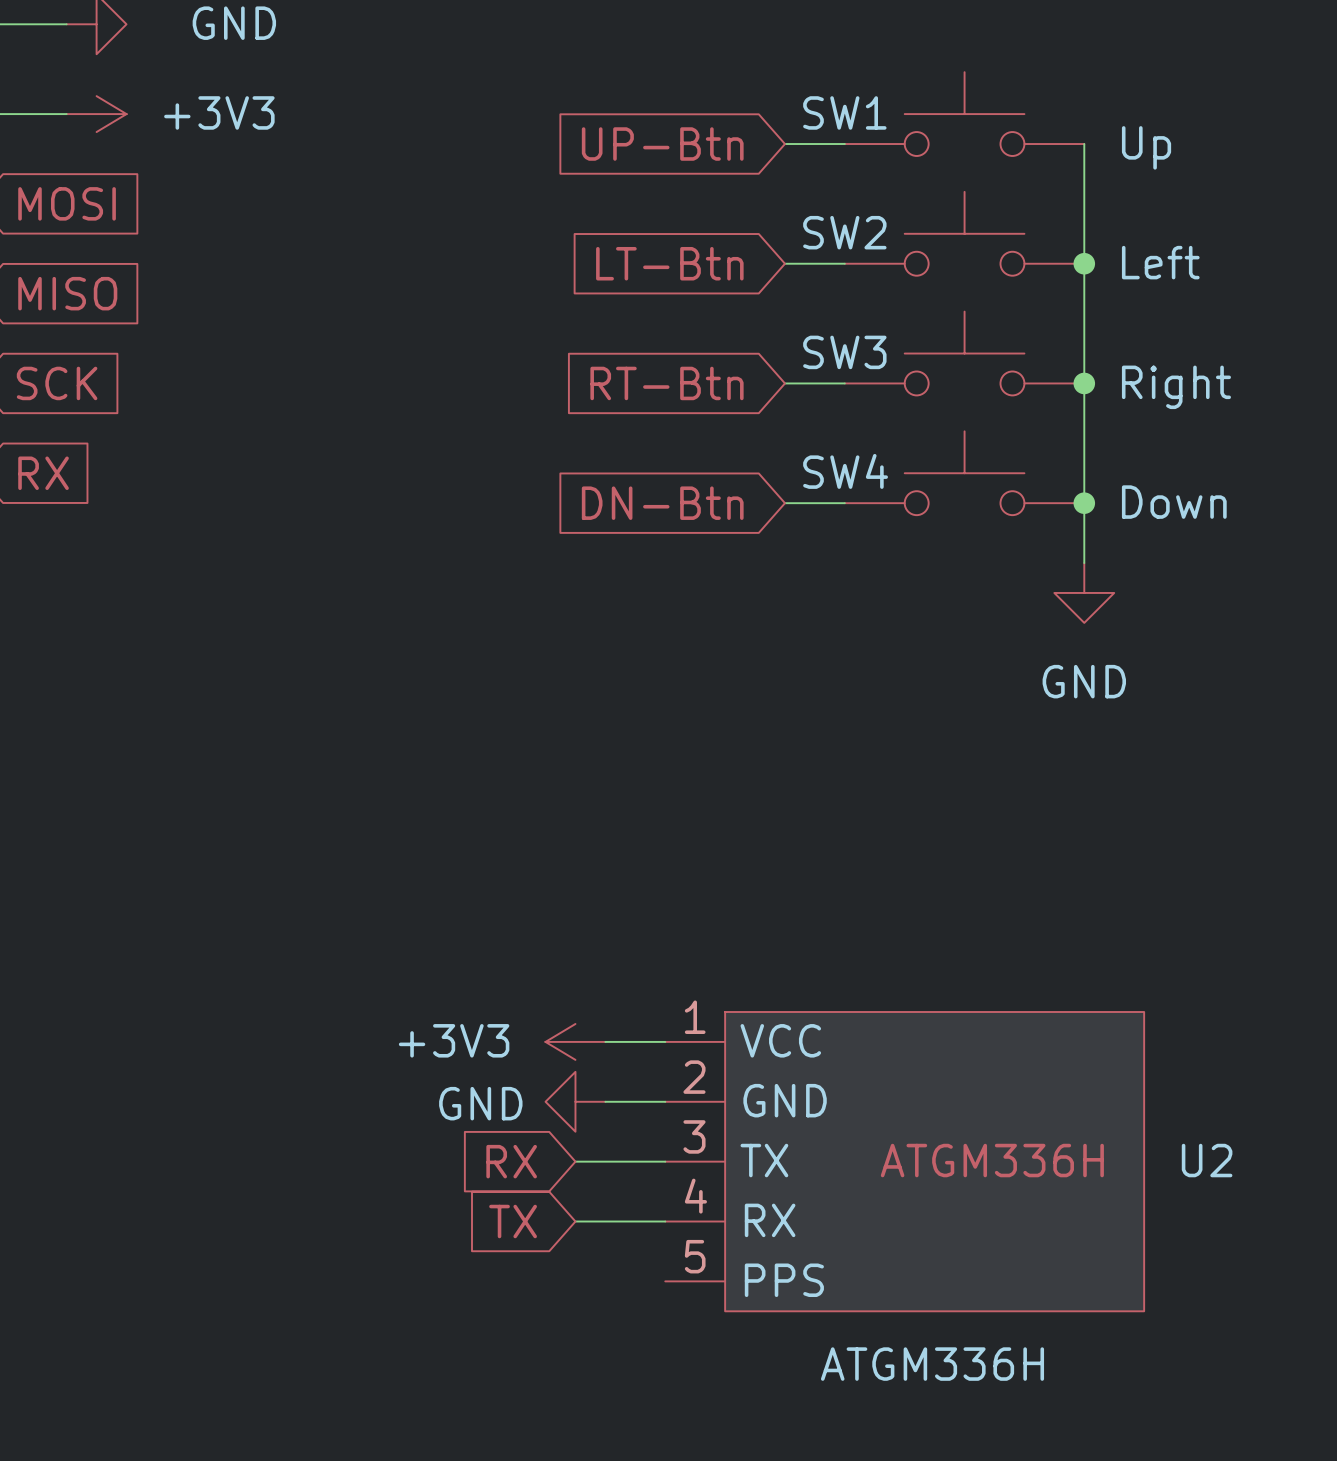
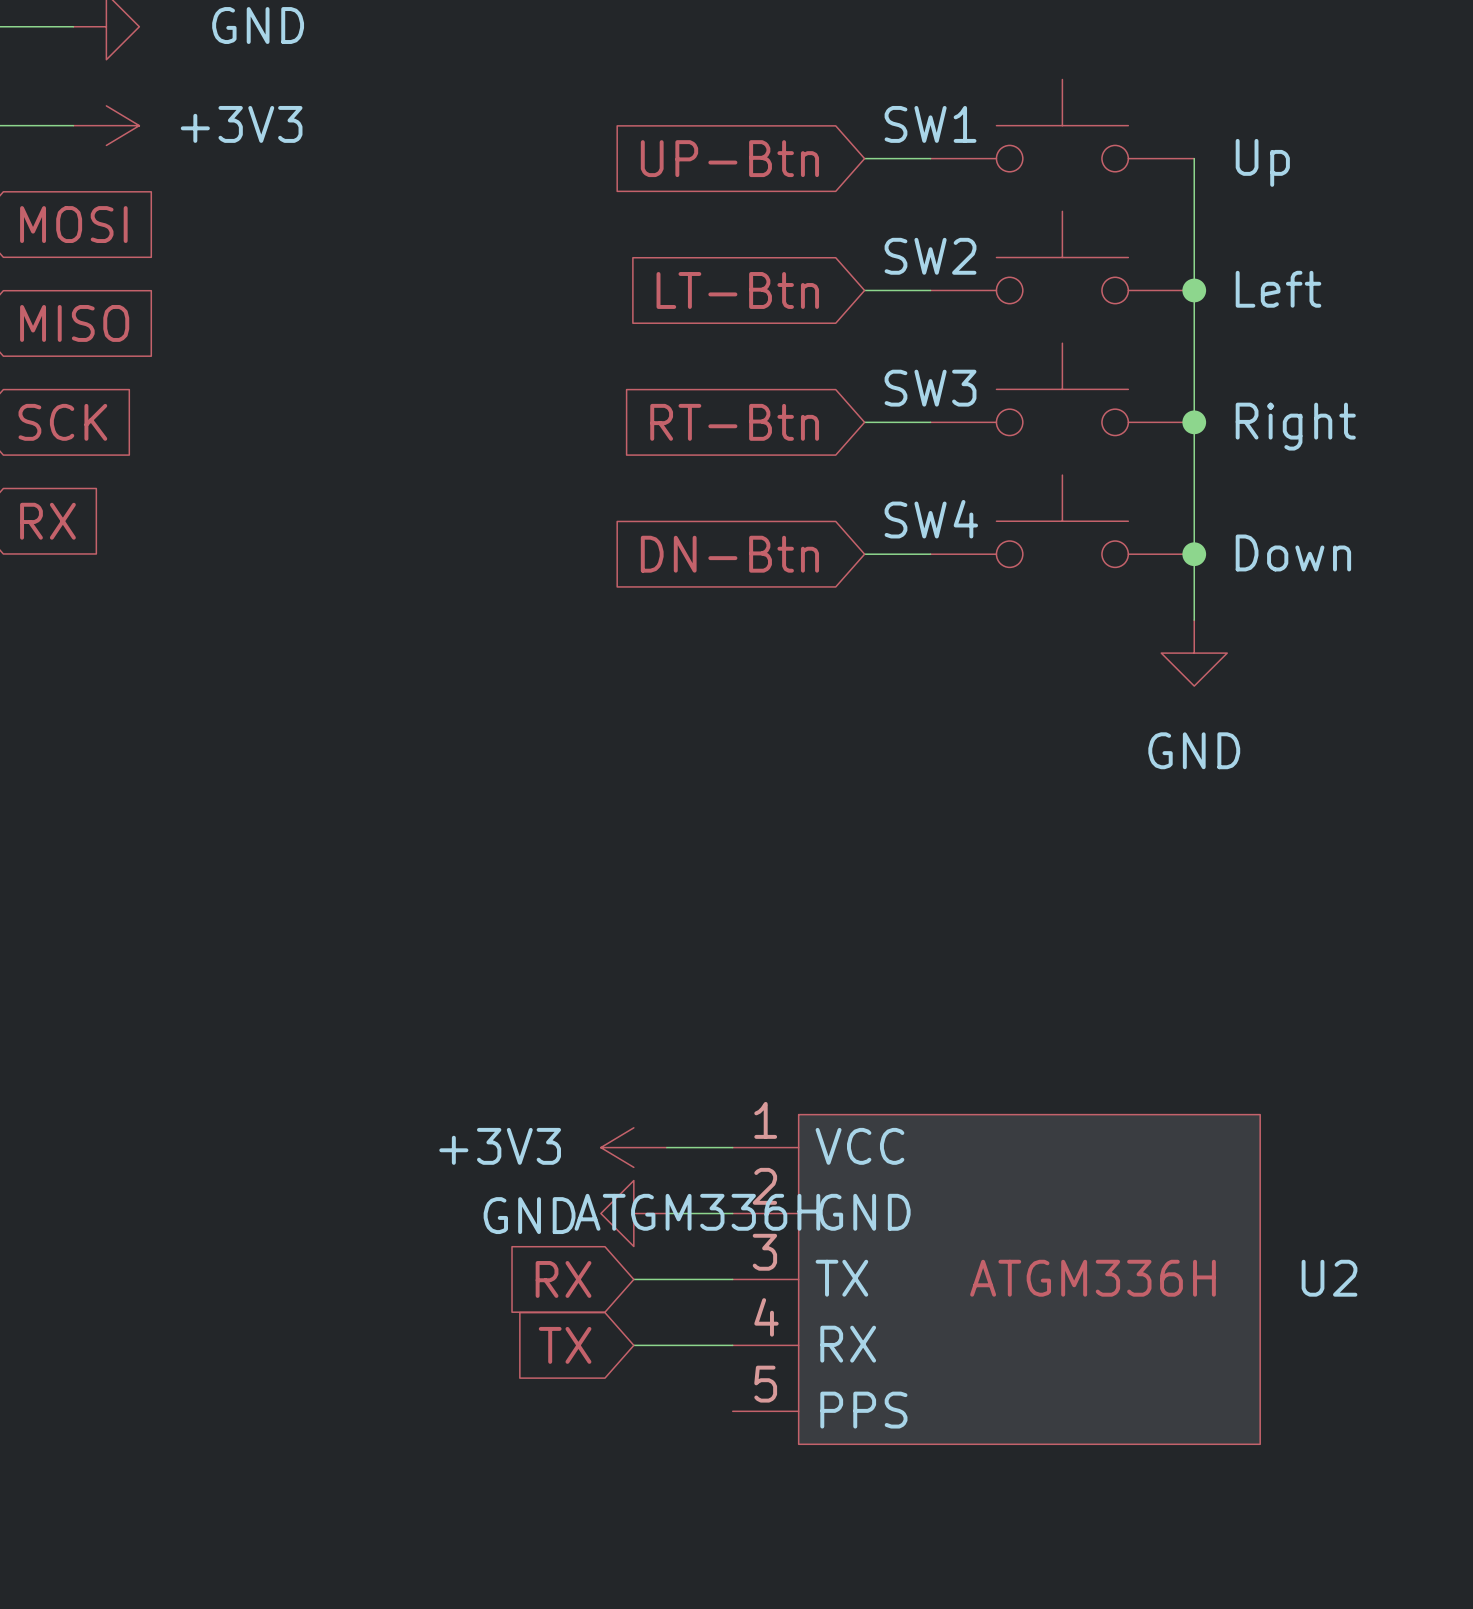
U2 value position: ATGM336H (932, 1364) -> ATGM336H (697, 1212)

